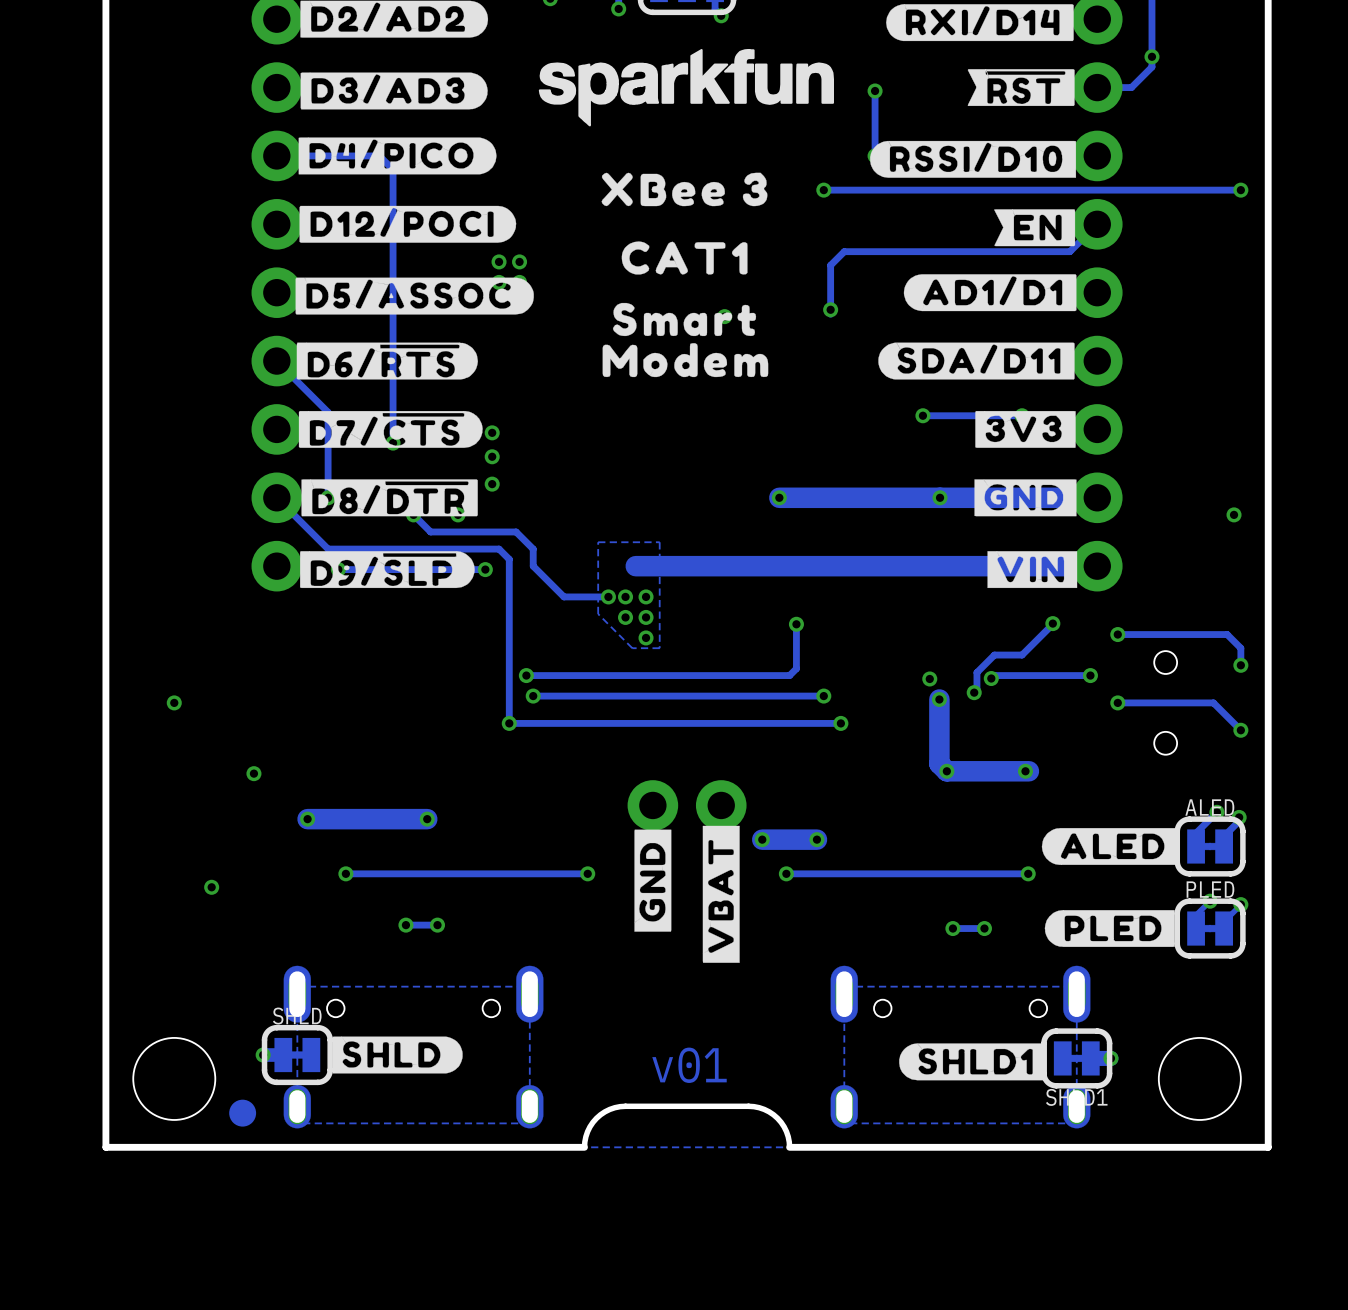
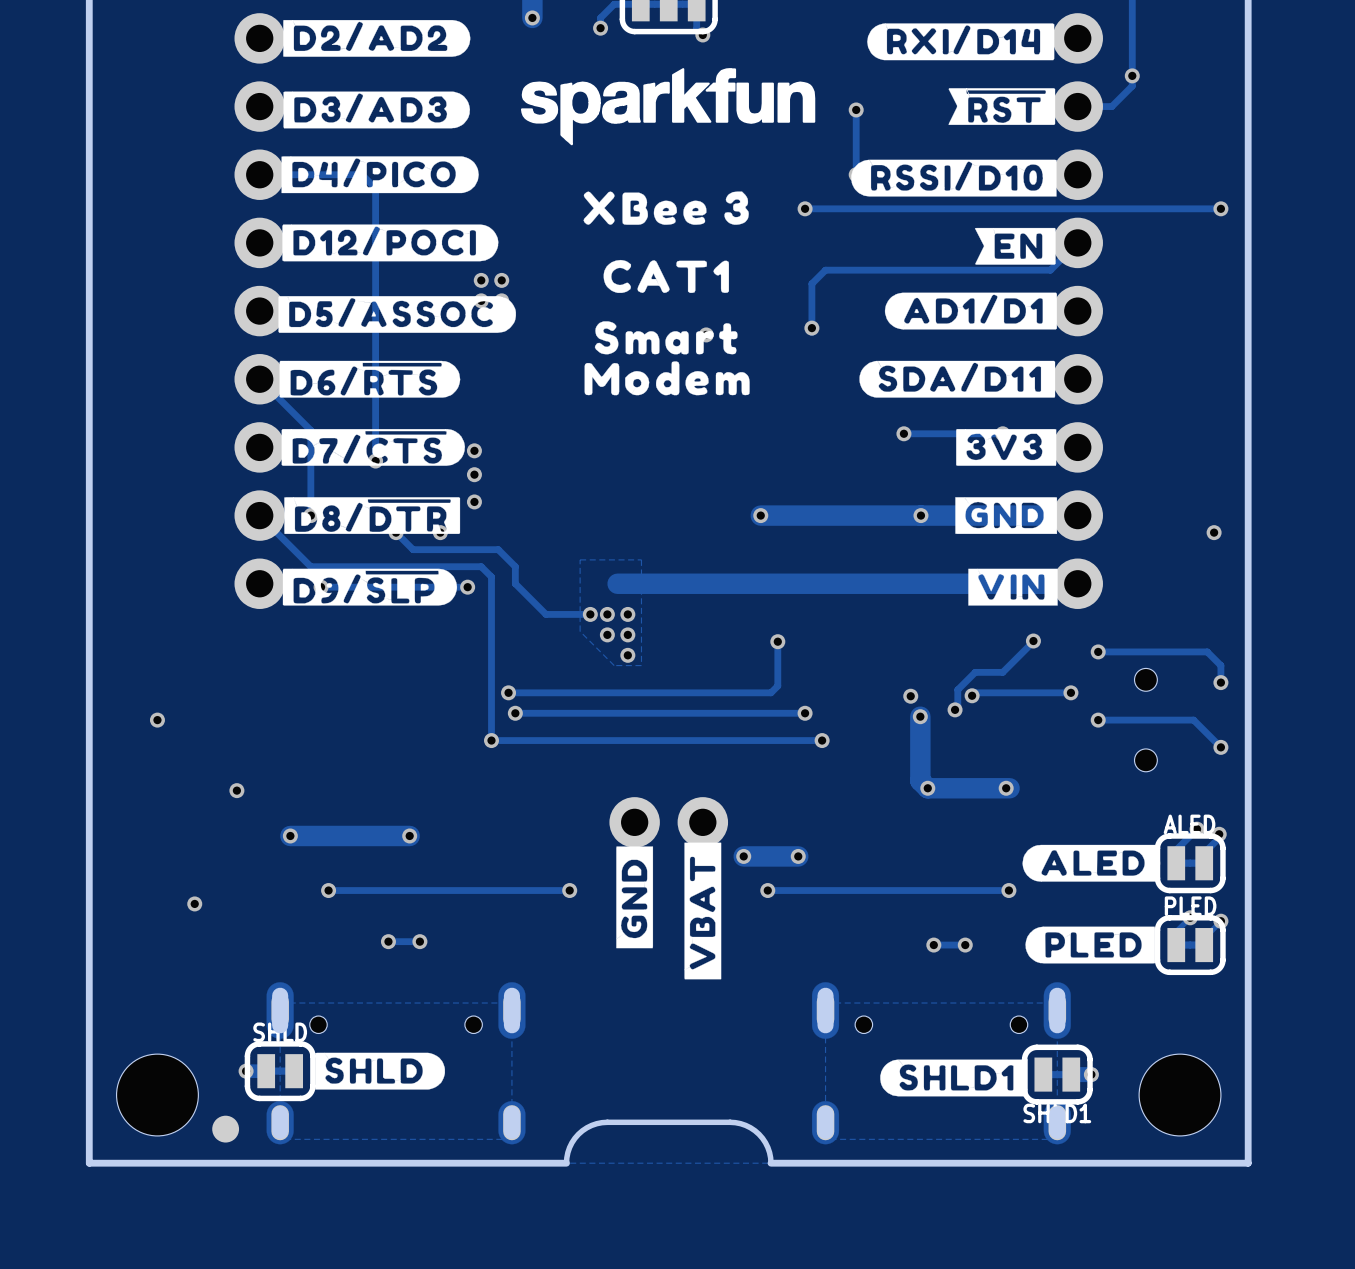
text: v01 (689, 1065) -> none

